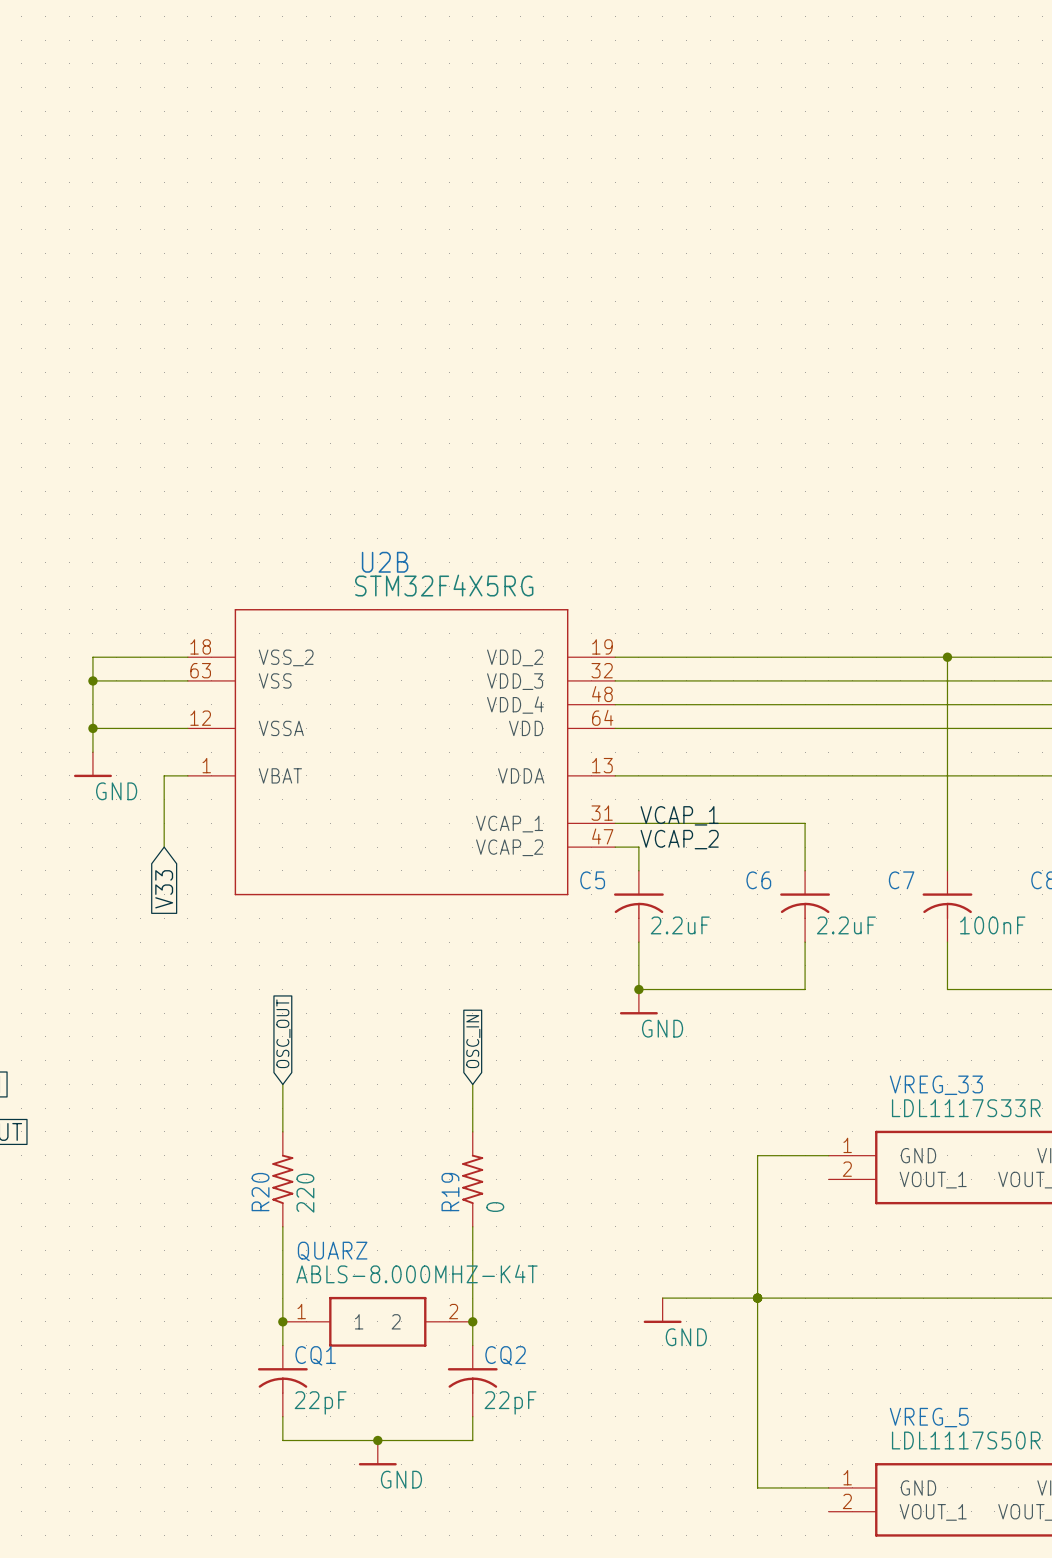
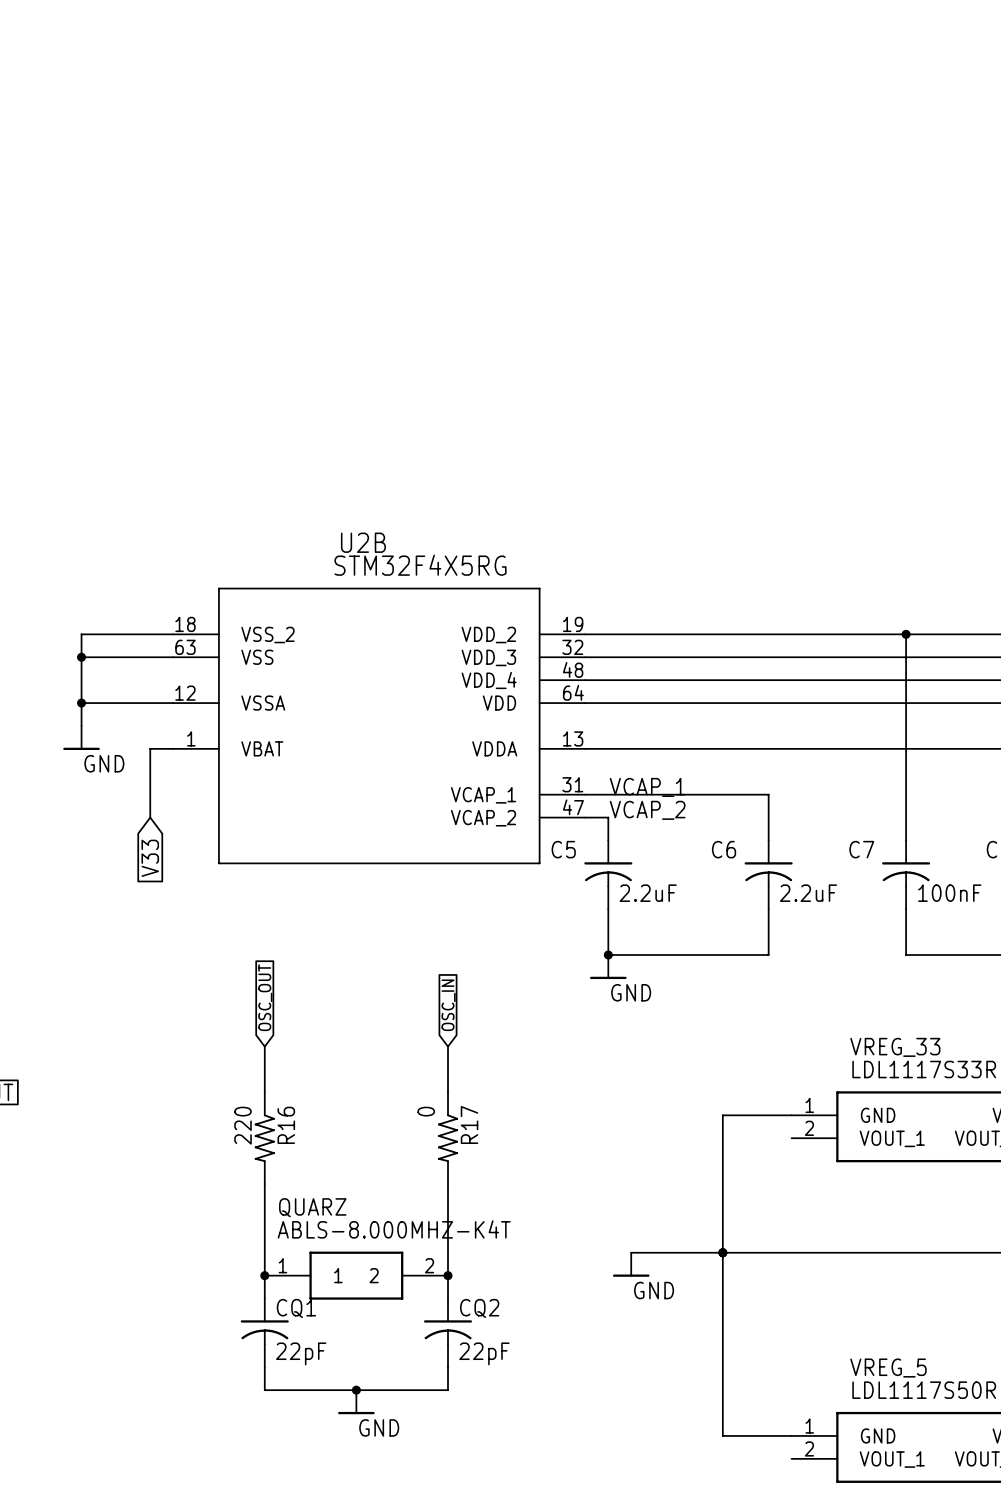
R20: 220 (282, 1179) -> none
R16: none -> 220 (264, 1138)
R19: 0 (472, 1179) -> none
R17: none -> 0 (448, 1138)

